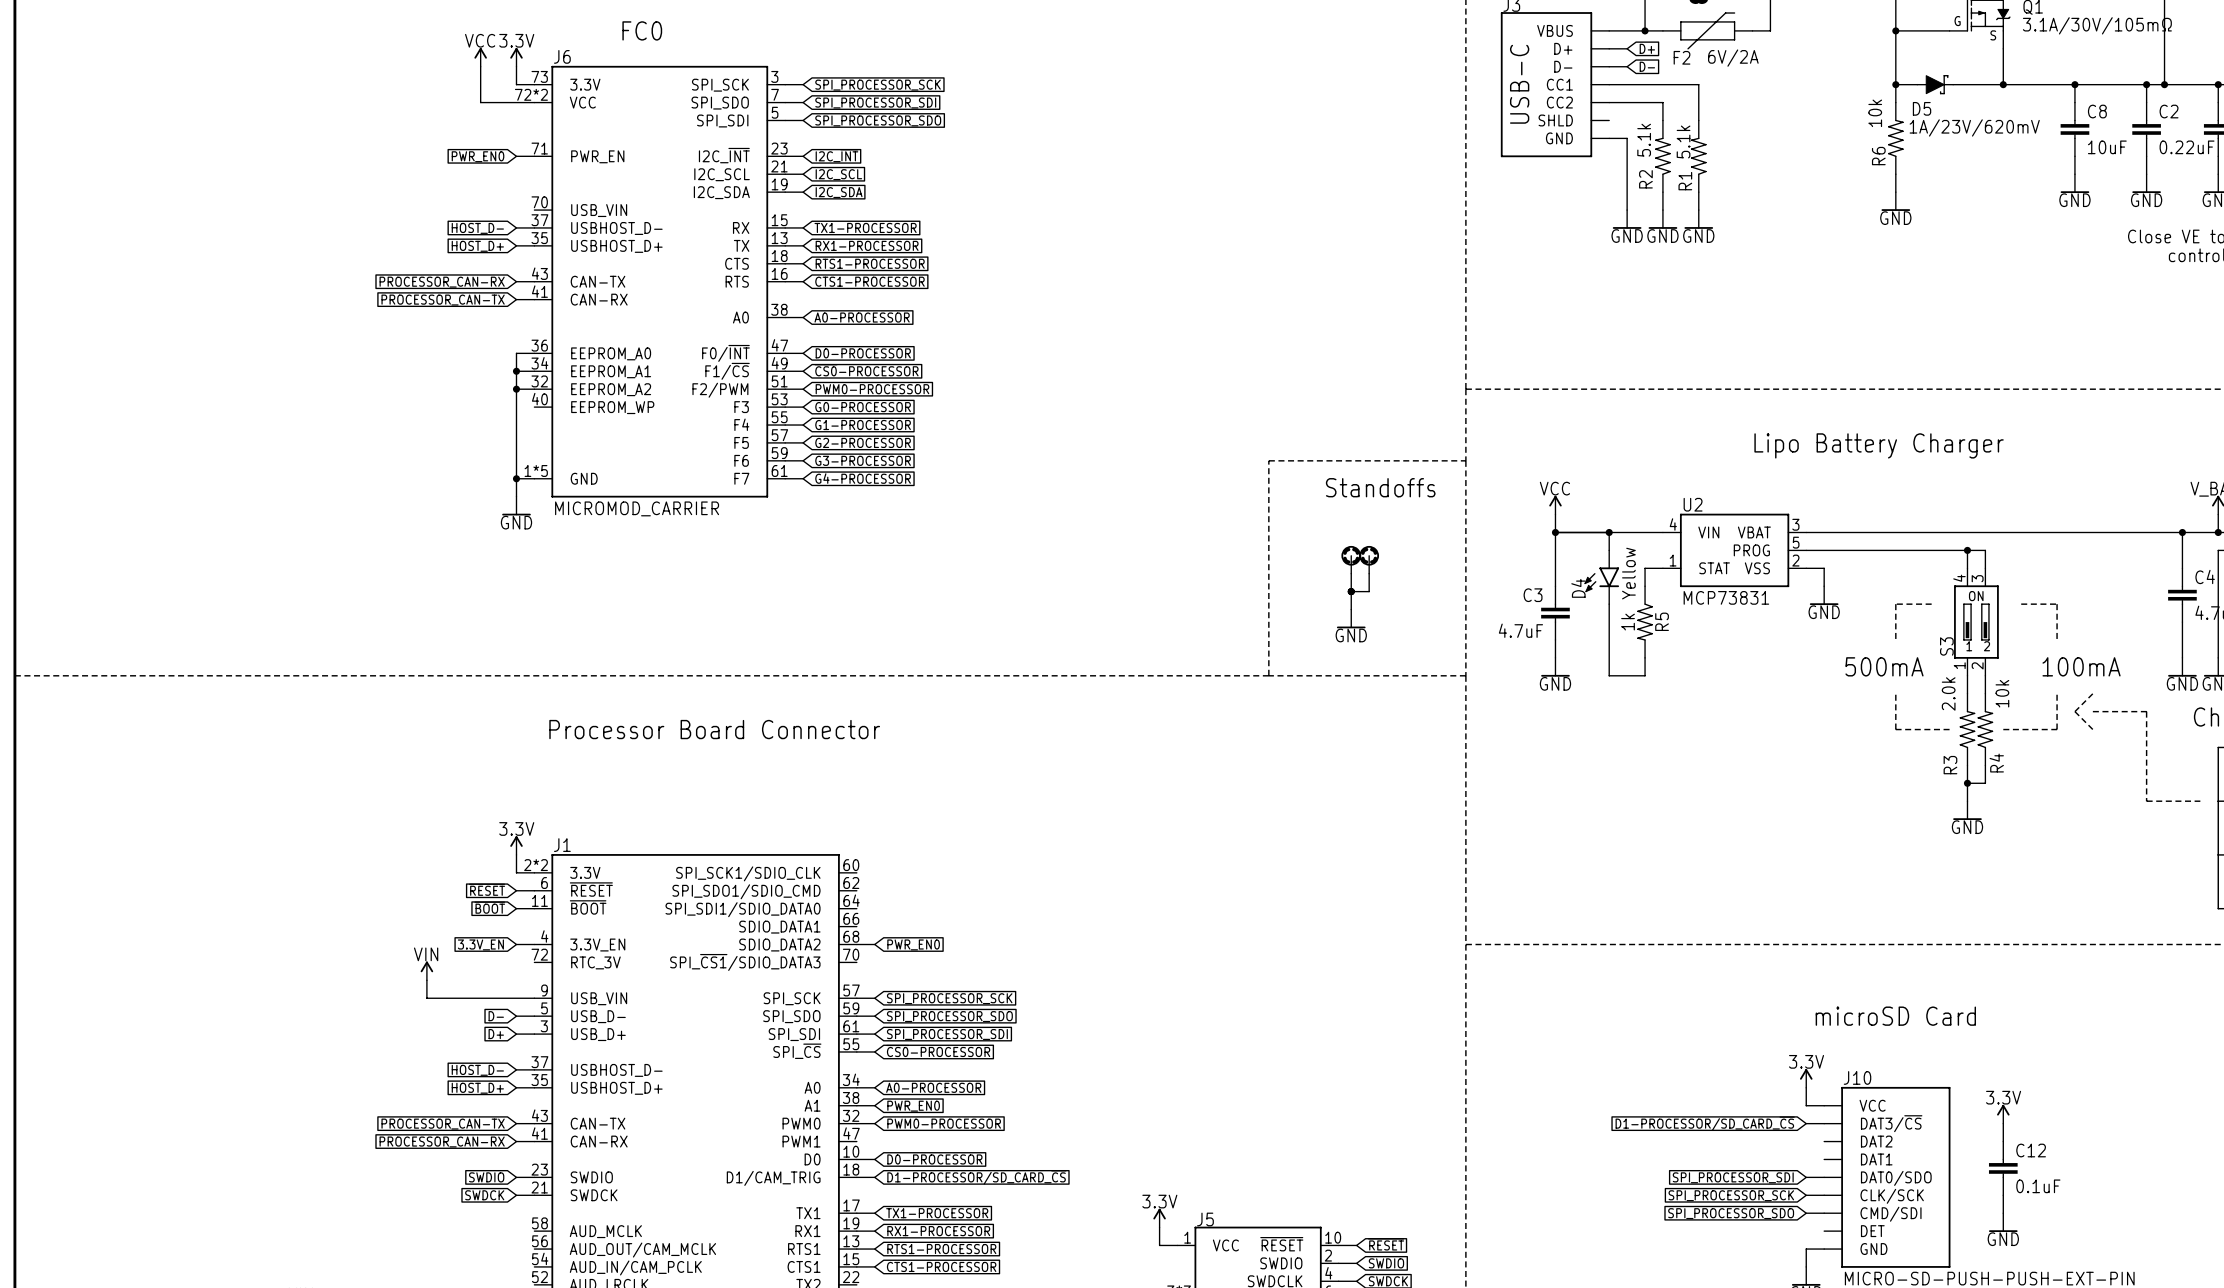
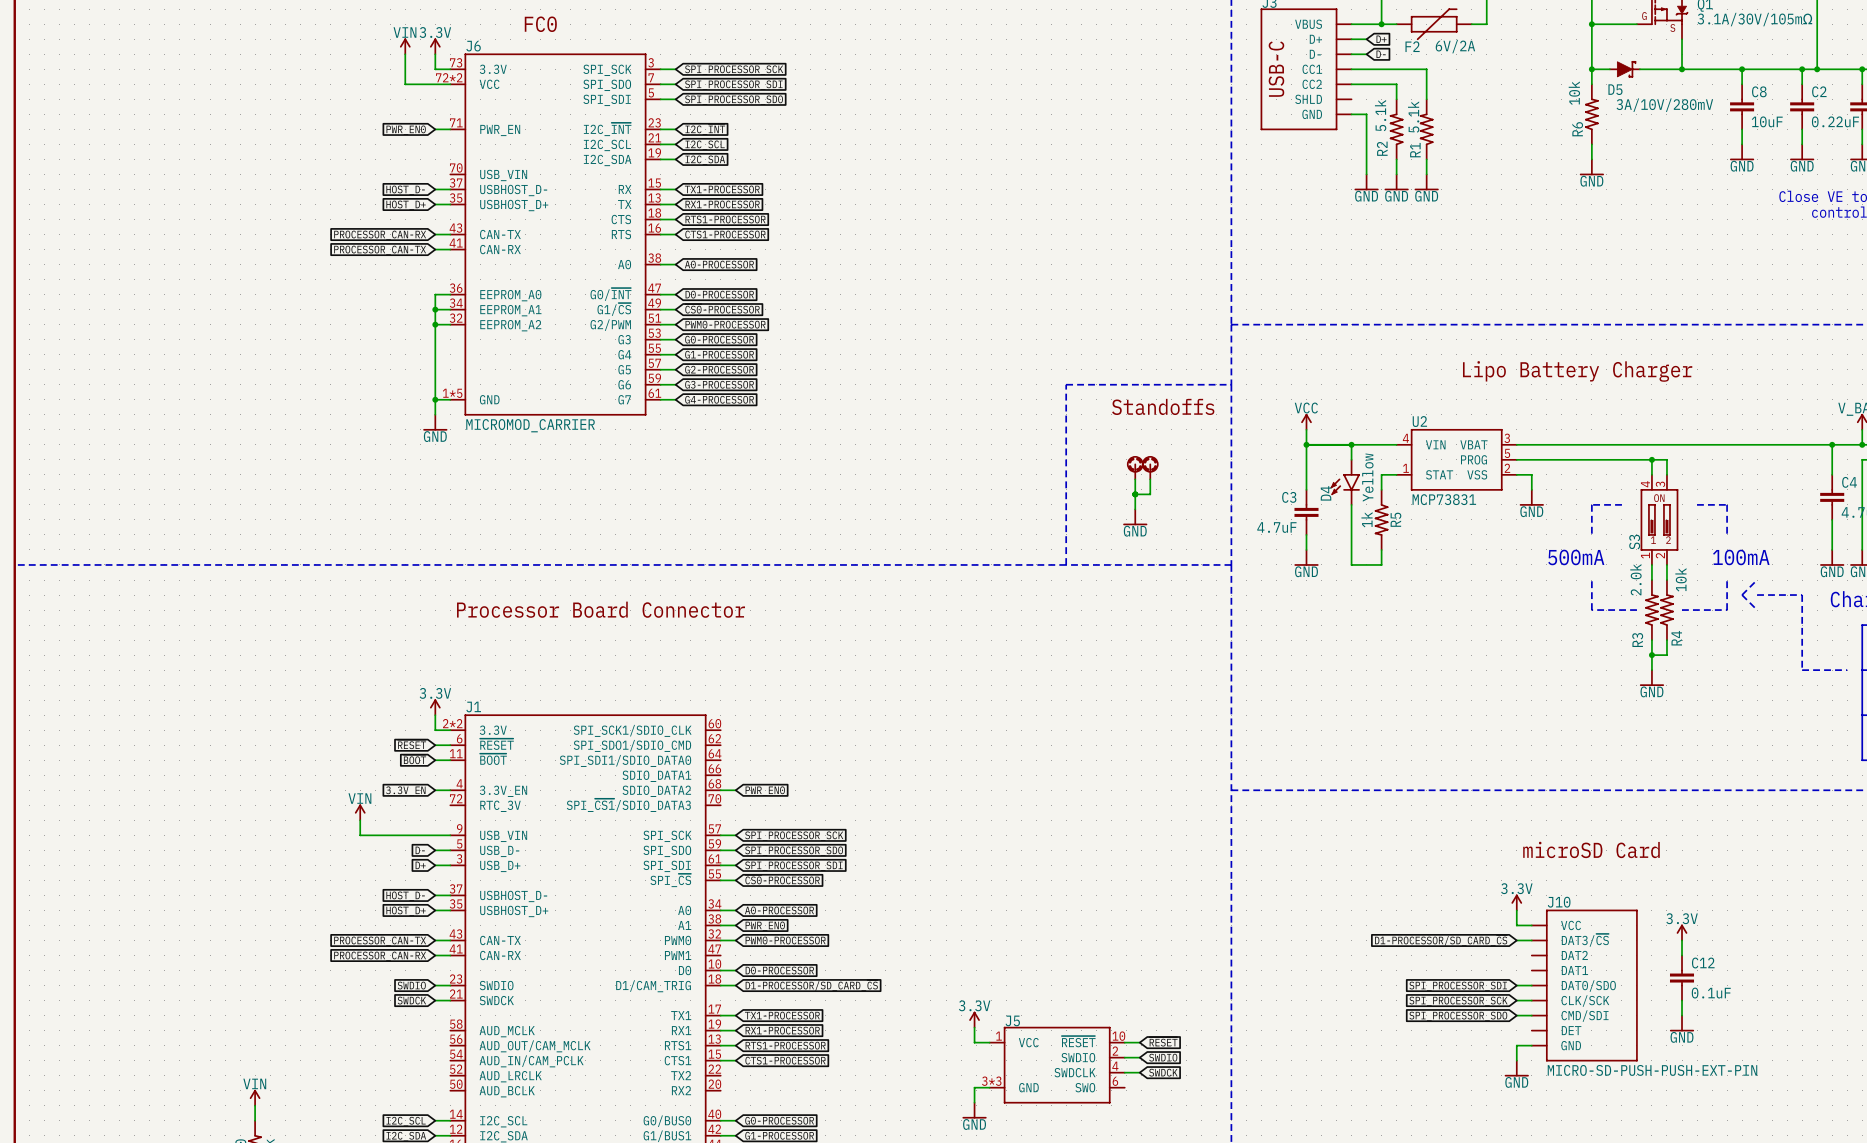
power symbol: VCC (480, 57) -> VIN (405, 46)
J6 symbol: [534, 65, 786, 498] -> [450, 53, 661, 416]
D5 value: 1A/23V/620mV (1974, 127) -> 3A/10V/280mV (1664, 105)

